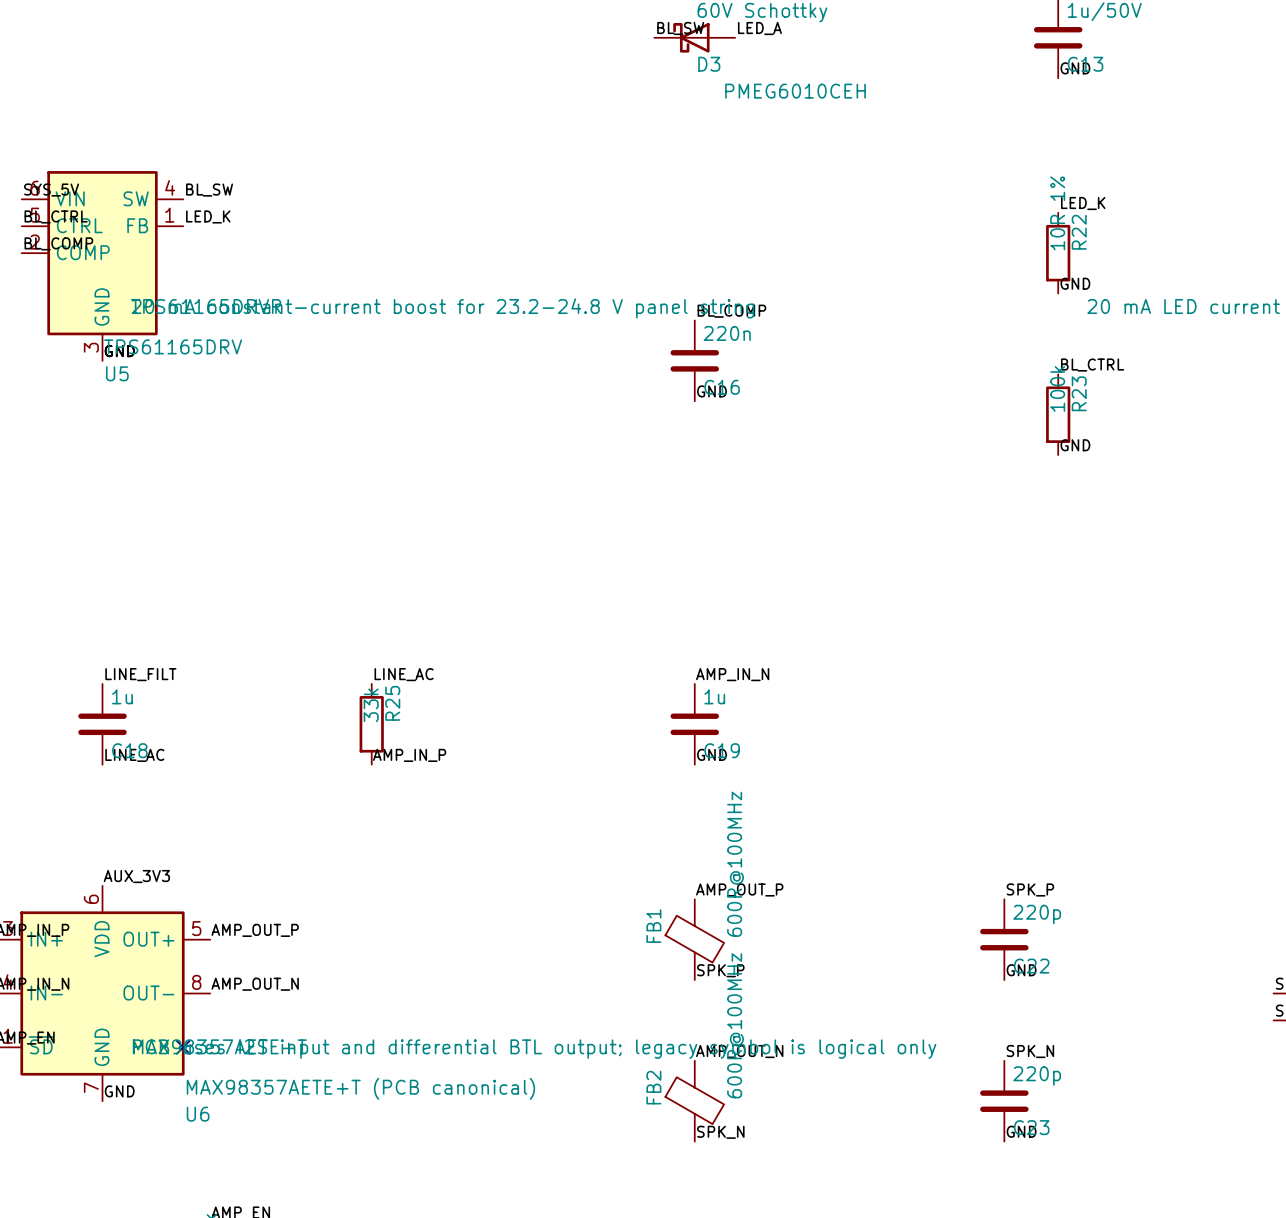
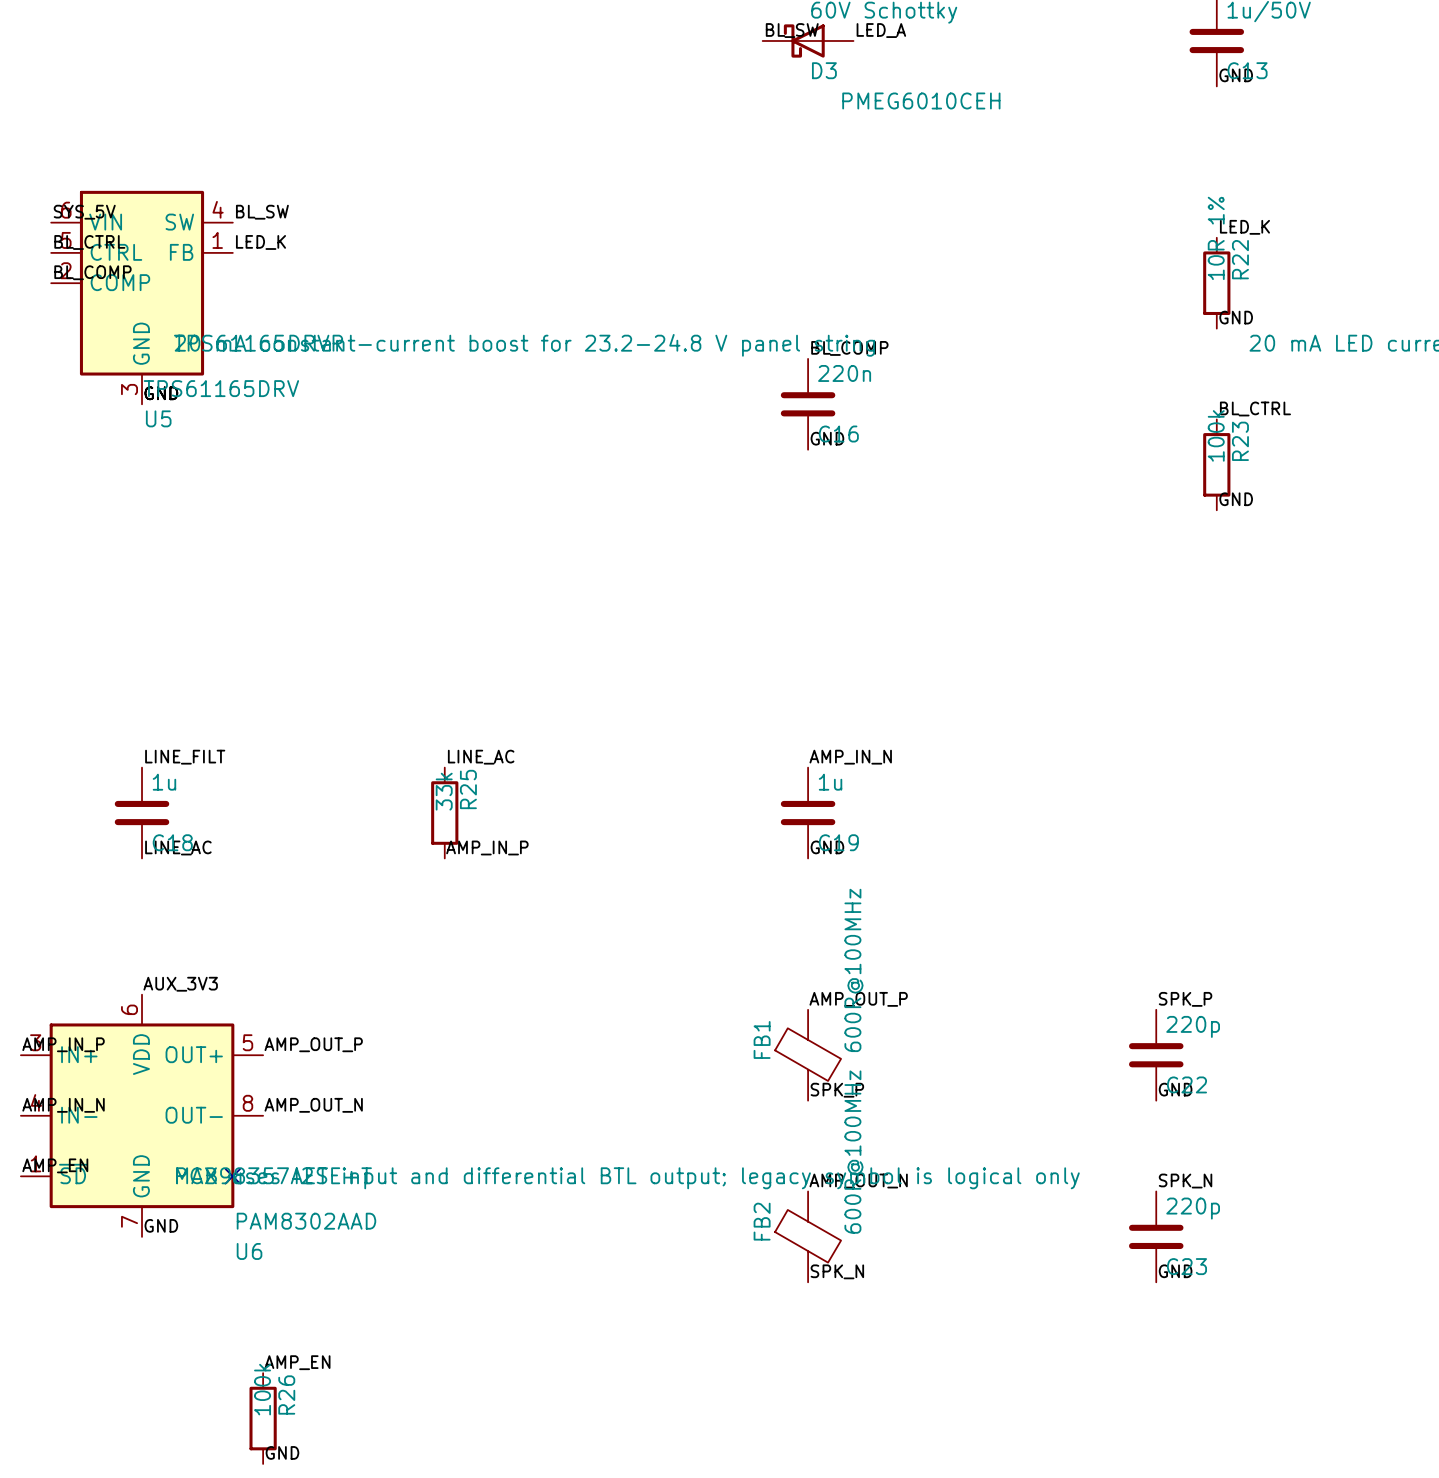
U6 value: MAX98357AETE+T (PCB canonical) (360, 1088) -> PAM8302AAD (306, 1221)

